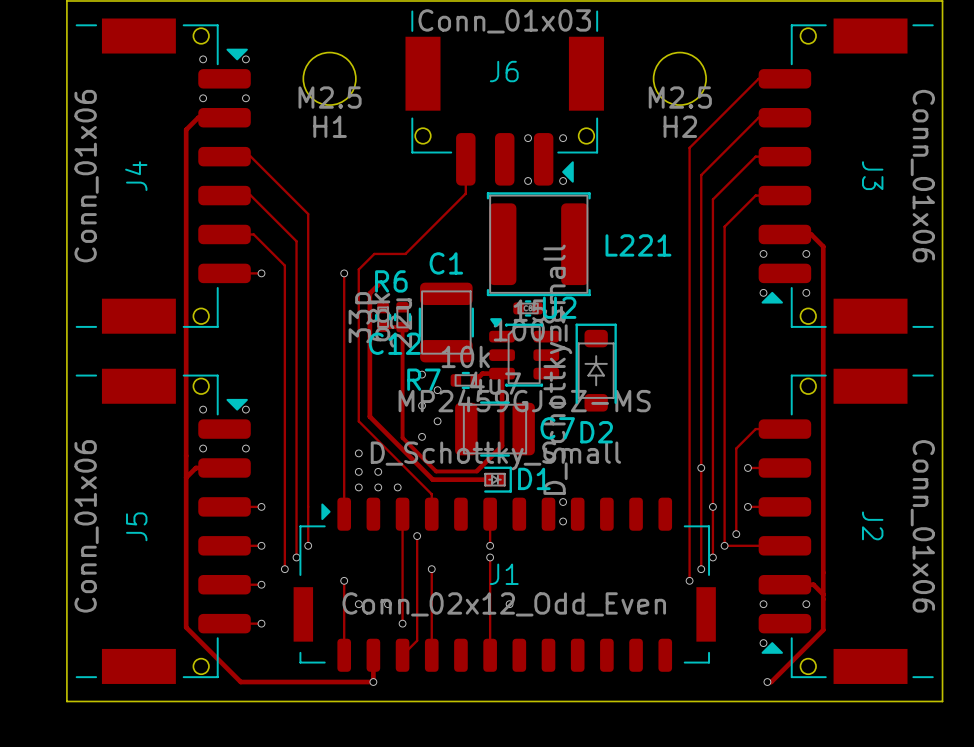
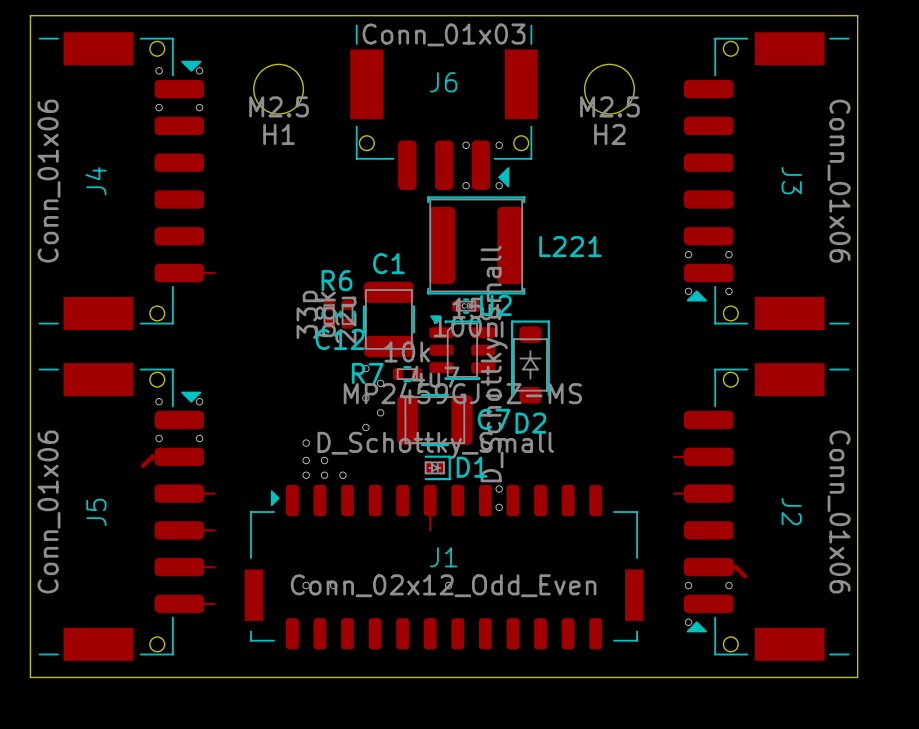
track: (784, 78) (758, 78) (689, 147) (689, 580) -> none
track: (224, 117) (198, 117) (186, 129) (186, 627) (240, 682) (373, 682) (373, 655) -> none
track: (784, 117) (758, 117) (701, 175) (701, 569) -> none
track: (465, 139) (465, 193) (405, 253) (374, 253) (358, 269) (358, 421) (431, 494) (431, 514) -> none
track: (224, 156) (250, 156) (308, 214) (308, 545) -> none
track: (784, 156) (755, 156) (712, 199) (712, 505) -> none
track: (224, 195) (250, 195) (296, 241) (296, 557) -> none
track: (784, 195) (755, 195) (724, 226) (724, 545) (784, 545) -> none
track: (224, 234) (253, 234) (284, 265) (284, 569) -> none
track: (784, 234) (811, 234) (823, 246) (823, 630) (771, 682) (767, 682) -> none
via: (261, 273) -> none
track: (344, 273) (344, 504) -> none
via: (344, 273) -> none
track: (378, 285) (369, 293) (369, 416) (432, 479) (488, 479) -> none
track: (383, 326) (402, 327) (402, 437) (436, 471) (476, 471) -> none
track: (475, 380) (482, 373) (502, 373) (502, 445) (476, 471) -> none
track: (784, 429) (755, 429) (736, 448) (736, 534) -> none
via: (701, 467) -> none
via: (747, 467) -> none
via: (261, 506) -> none
track: (712, 506) (712, 557) -> none
via: (712, 506) -> none
via: (747, 506) -> none
track: (402, 523) (402, 623) -> none
via: (736, 534) -> none
track: (417, 536) (417, 640) (402, 655) -> none
via: (417, 536) -> none
via: (261, 545) -> none
via: (308, 545) -> none
via: (490, 545) -> none
via: (724, 545) -> none
via: (296, 557) -> none
track: (490, 557) (490, 645) -> none
via: (490, 557) -> none
via: (712, 557) -> none
via: (284, 569) -> none
track: (431, 569) (431, 655) -> none
via: (431, 569) -> none
via: (701, 569) -> none
track: (344, 580) (344, 655) -> none
via: (344, 580) -> none
via: (689, 580) -> none
via: (261, 584) -> none
via: (261, 623) -> none
via: (402, 623) -> none
via: (373, 682) -> none
via: (767, 682) -> none

